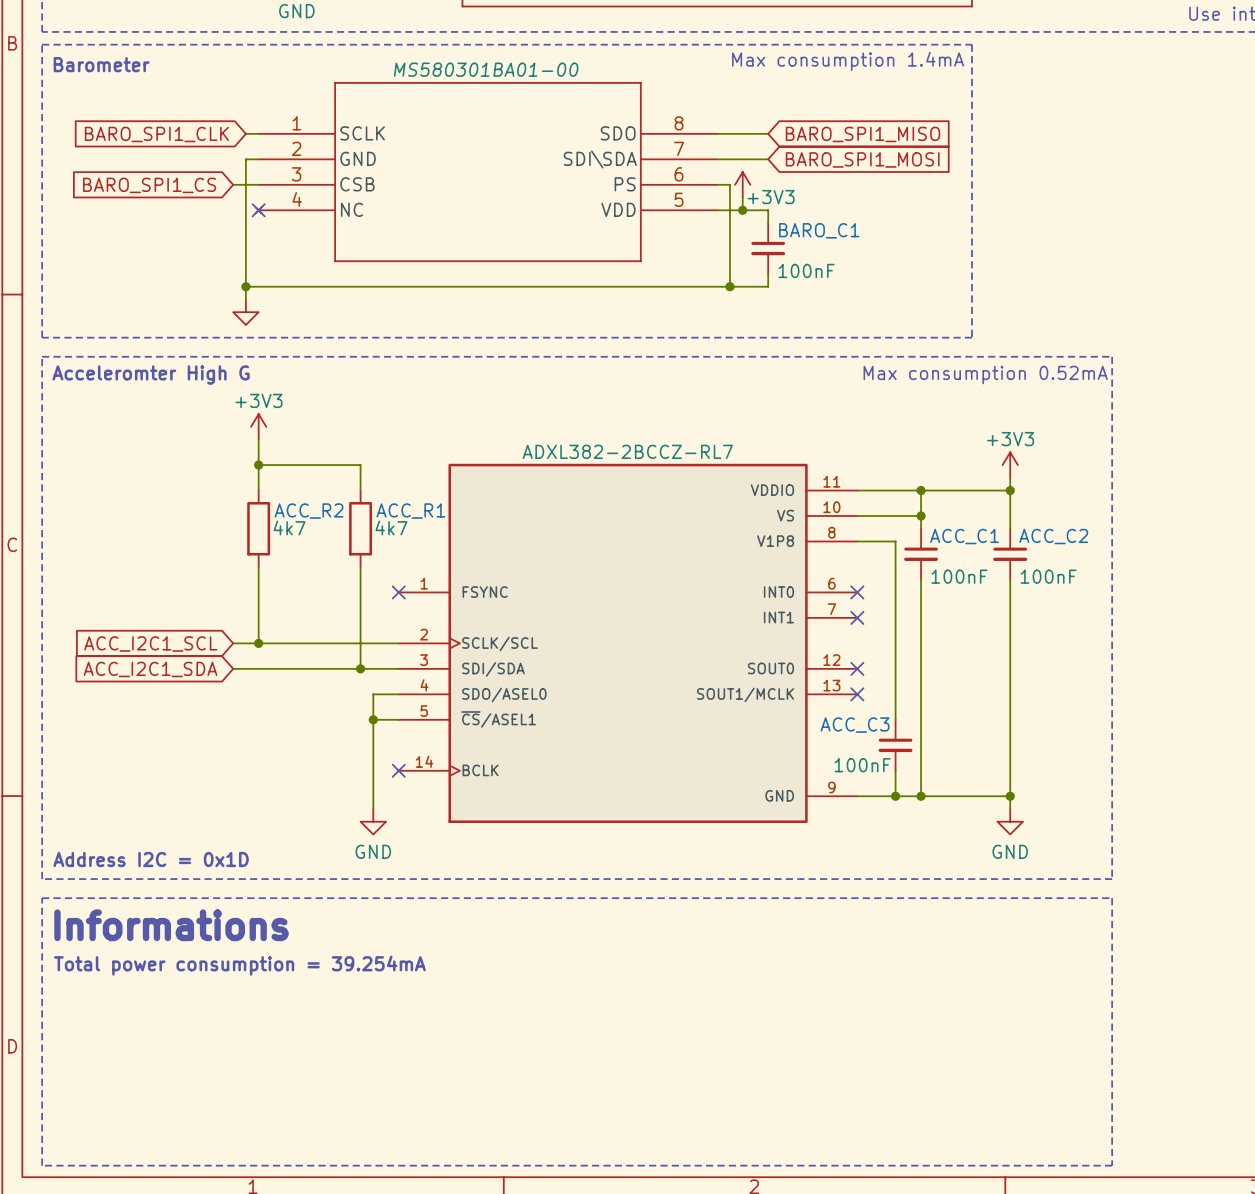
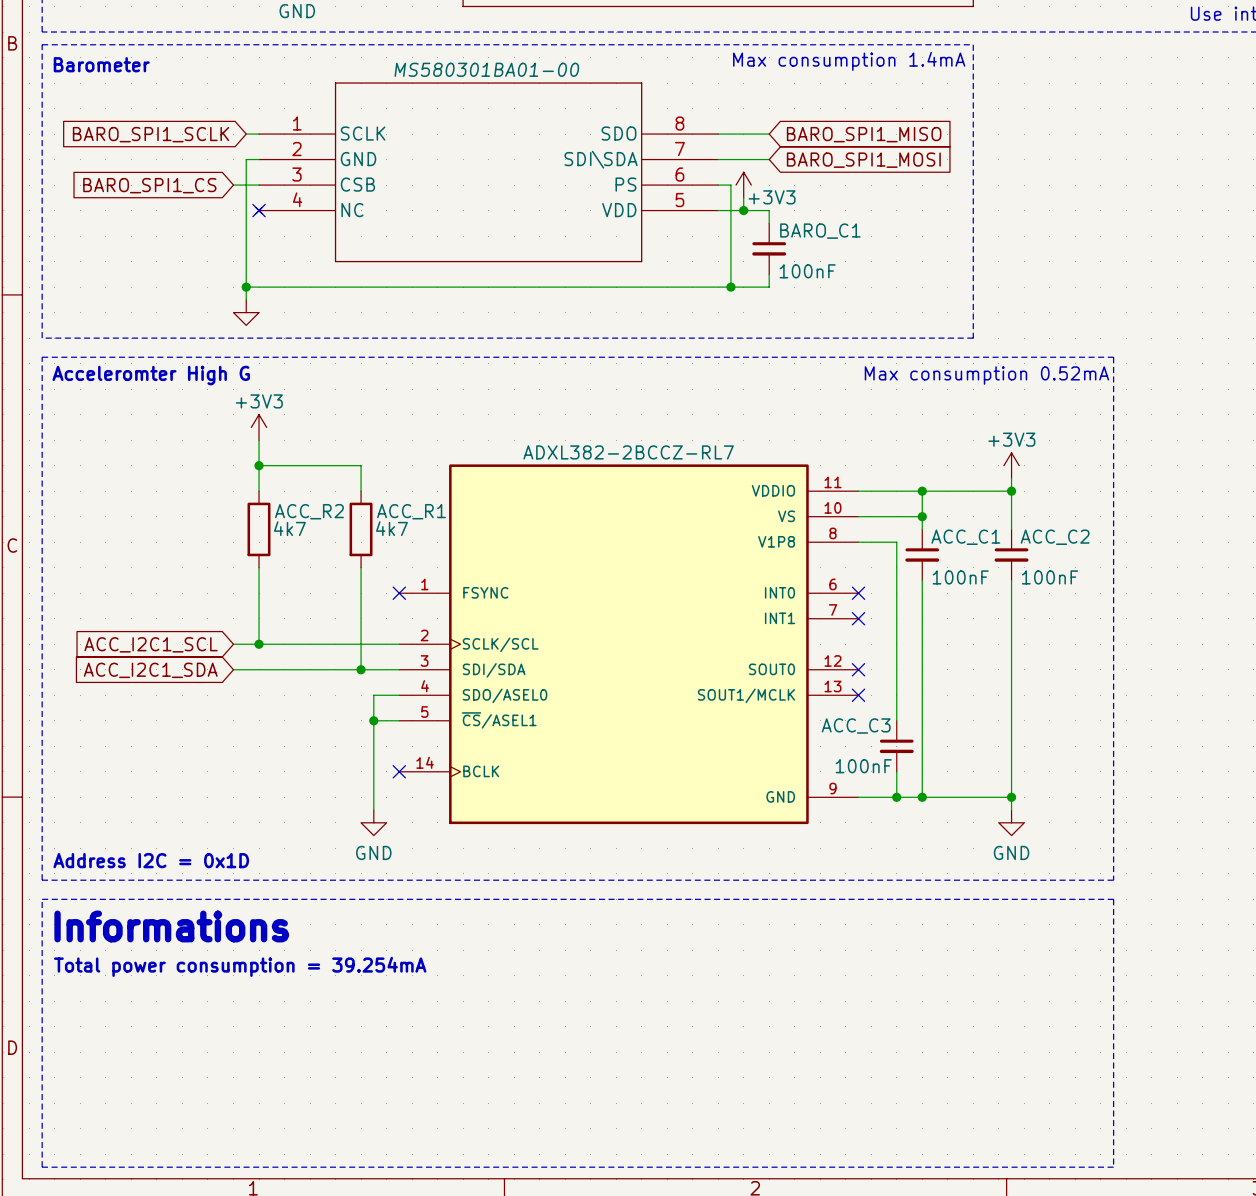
global label: BARO_SPI1_CLK (156, 134) -> BARO_SPI1_SCLK (151, 134)

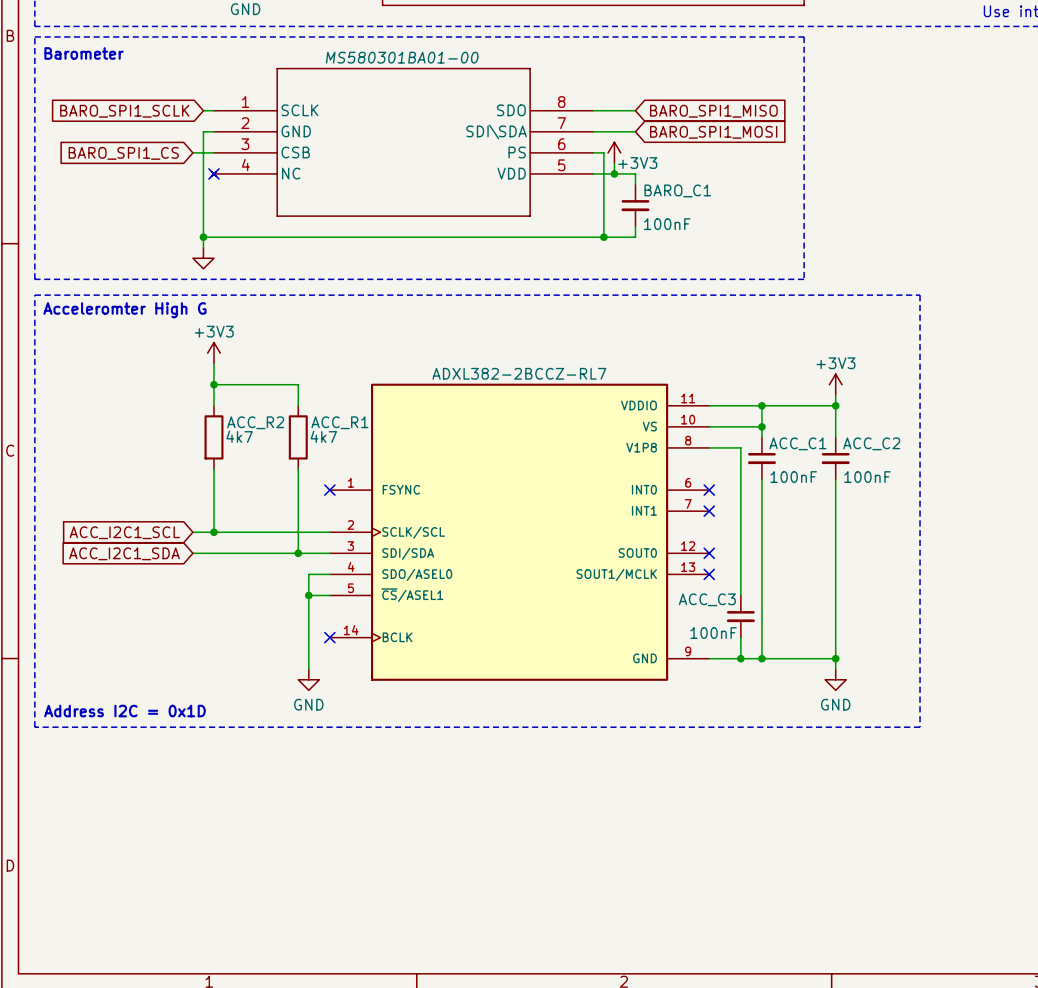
text: Max consumption 1.4mA (849, 61) -> none
text: Max consumption 0.52mA (986, 375) -> none
line: (42, 899) (1113, 899) (1113, 1167) (42, 1167) (42, 899) -> none
text: Informations (171, 926) -> none
text: Total power consumption = 39.254mA (240, 966) -> none

